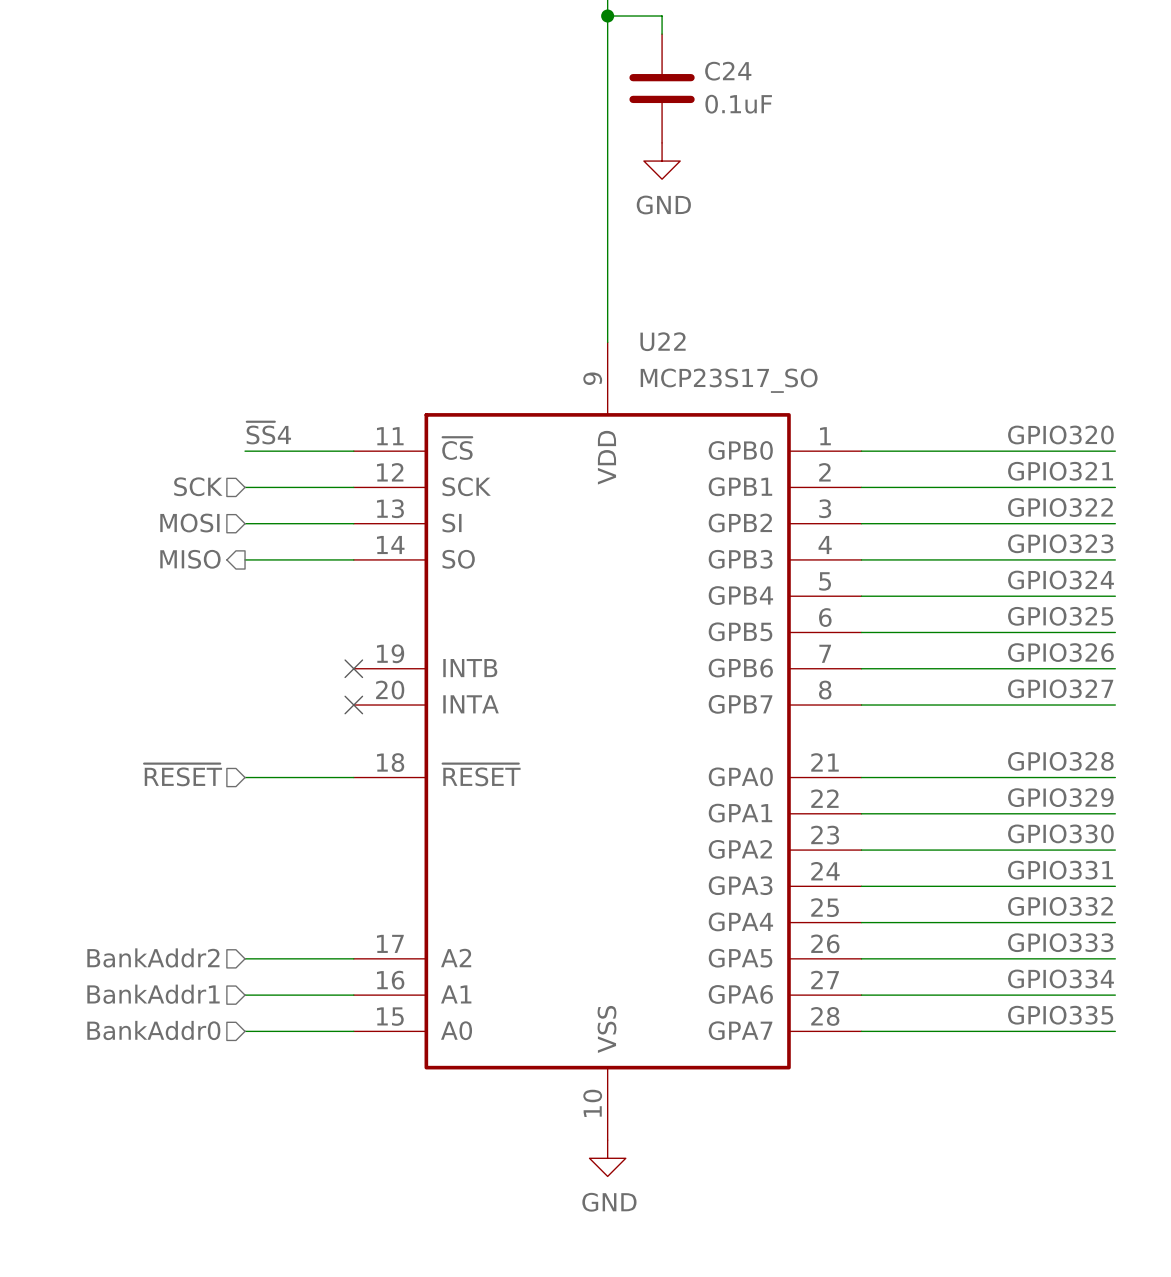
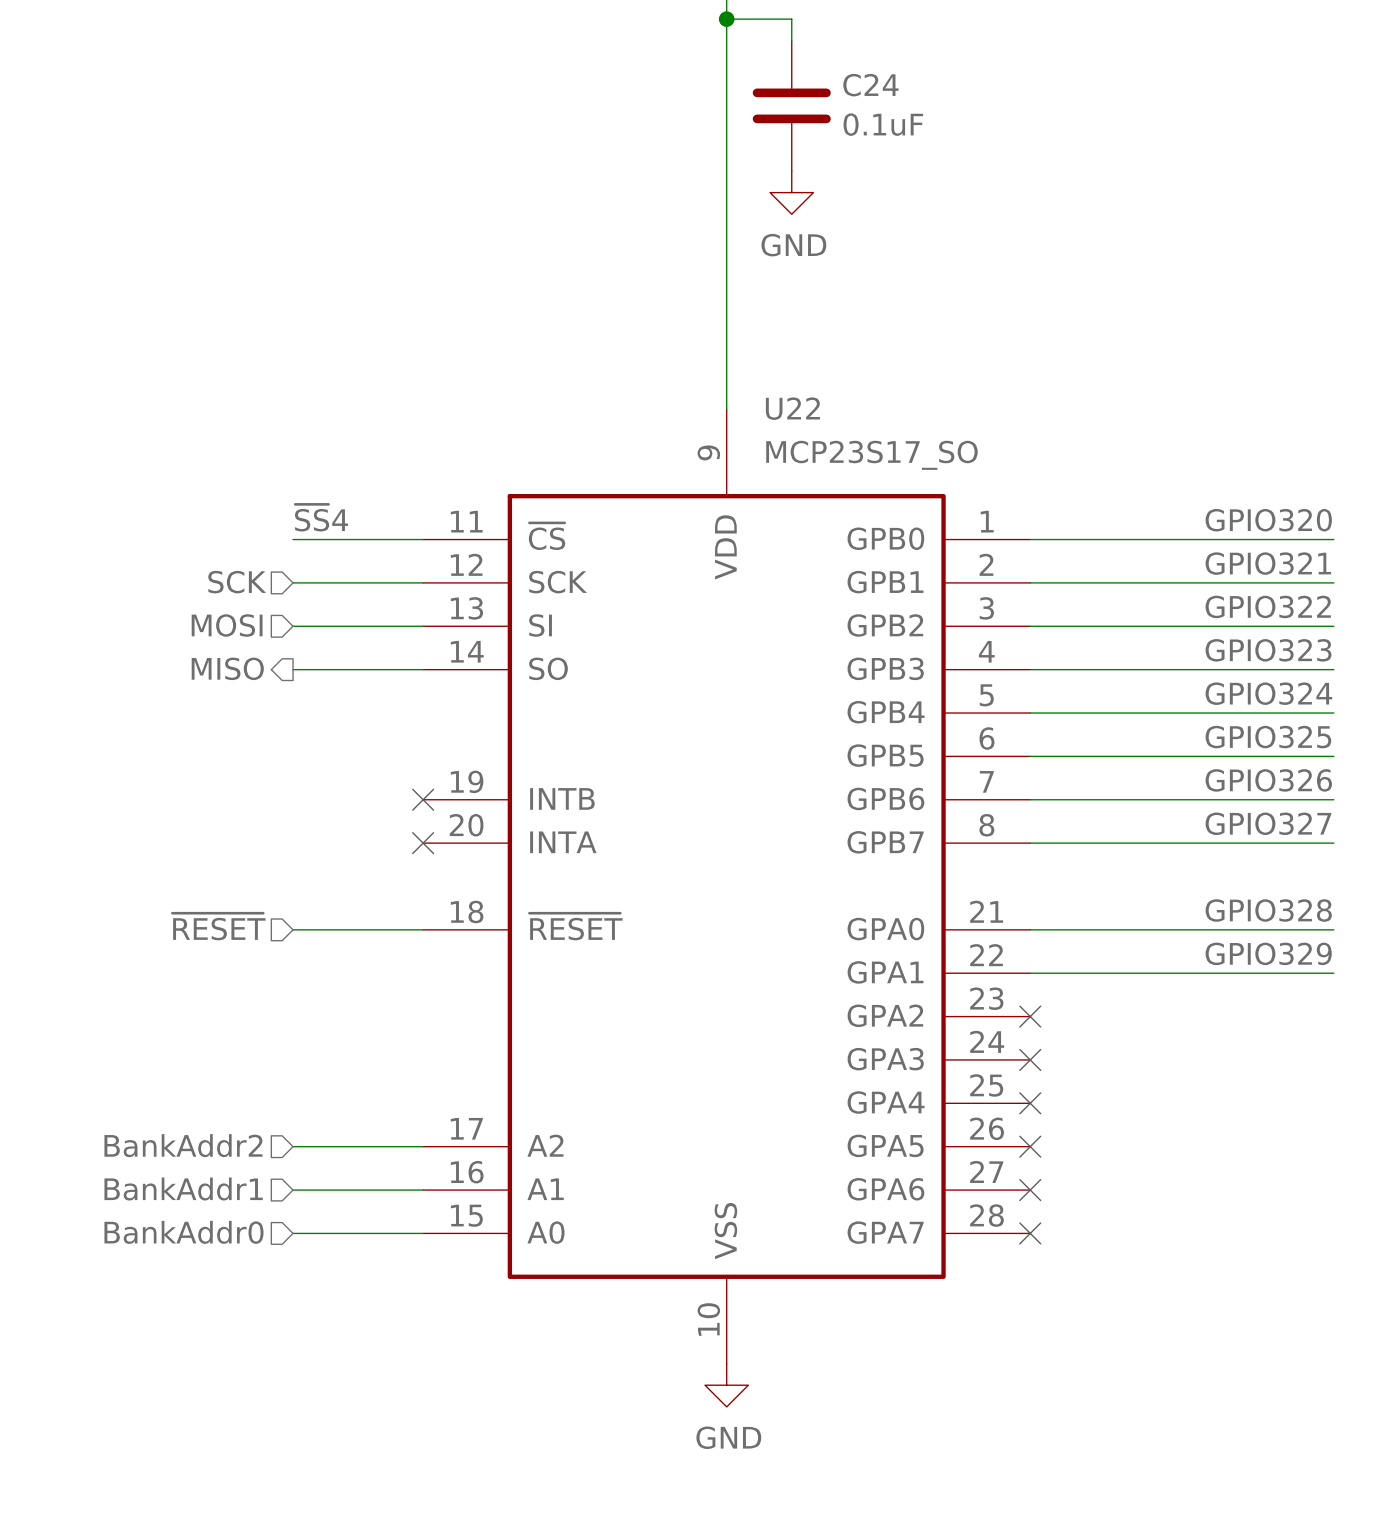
label: GPIO330 (1060, 833) -> none
wire: (861, 850) (1115, 850) -> none
no-connect mark: none -> (1030, 1016)
label: GPIO331 (1060, 870) -> none
wire: (861, 886) (1115, 886) -> none
no-connect mark: none -> (1030, 1059)
label: GPIO332 (1060, 906) -> none
wire: (861, 922) (1115, 922) -> none
no-connect mark: none -> (1030, 1103)
label: GPIO333 (1060, 942) -> none
wire: (861, 958) (1115, 958) -> none
no-connect mark: none -> (1030, 1146)
label: GPIO334 (1061, 978) -> none
wire: (861, 995) (1115, 995) -> none
no-connect mark: none -> (1030, 1190)
label: GPIO335 (1060, 1015) -> none
wire: (861, 1031) (1115, 1031) -> none
no-connect mark: none -> (1030, 1233)

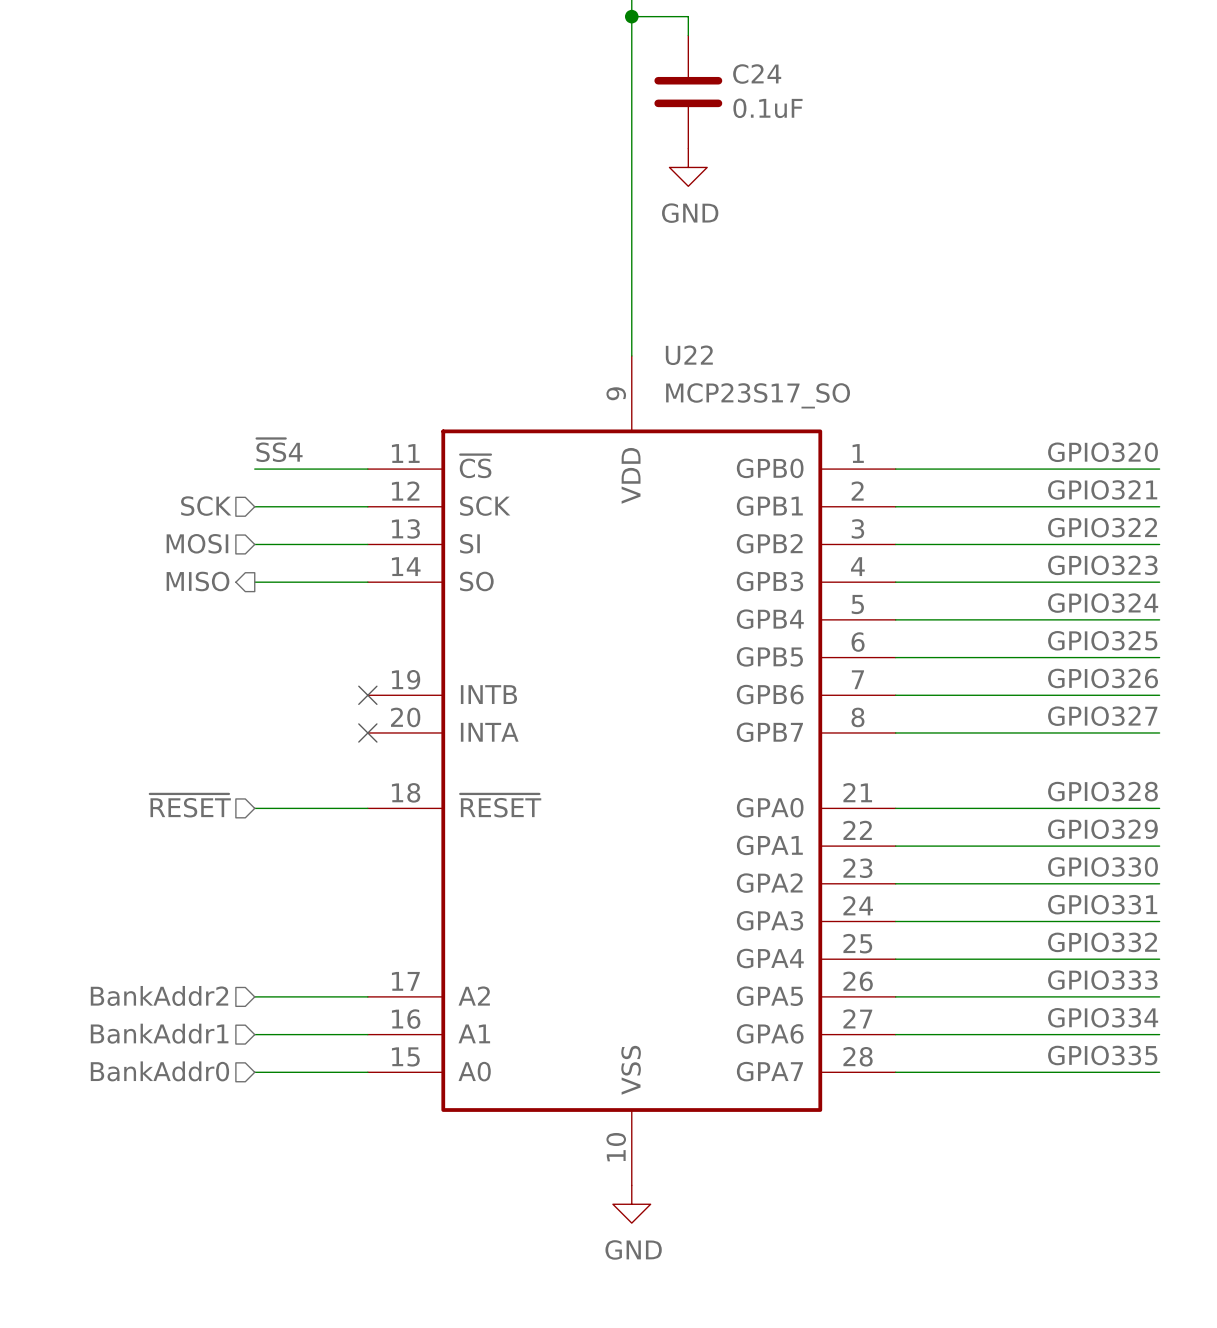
label: none -> GPIO330 (1102, 866)
wire: none -> (895, 883) (1159, 883)
no-connect mark: (1030, 1016) -> none
label: none -> GPIO331 (1102, 904)
wire: none -> (895, 921) (1159, 921)
no-connect mark: (1030, 1059) -> none
label: none -> GPIO332 (1102, 942)
wire: none -> (895, 959) (1159, 959)
no-connect mark: (1030, 1103) -> none
label: none -> GPIO333 (1102, 980)
wire: none -> (895, 996) (1159, 996)
no-connect mark: (1030, 1146) -> none
label: none -> GPIO334 (1103, 1017)
wire: none -> (895, 1034) (1159, 1034)
no-connect mark: (1030, 1190) -> none
label: none -> GPIO335 (1102, 1055)
wire: none -> (895, 1072) (1159, 1072)
no-connect mark: (1030, 1233) -> none

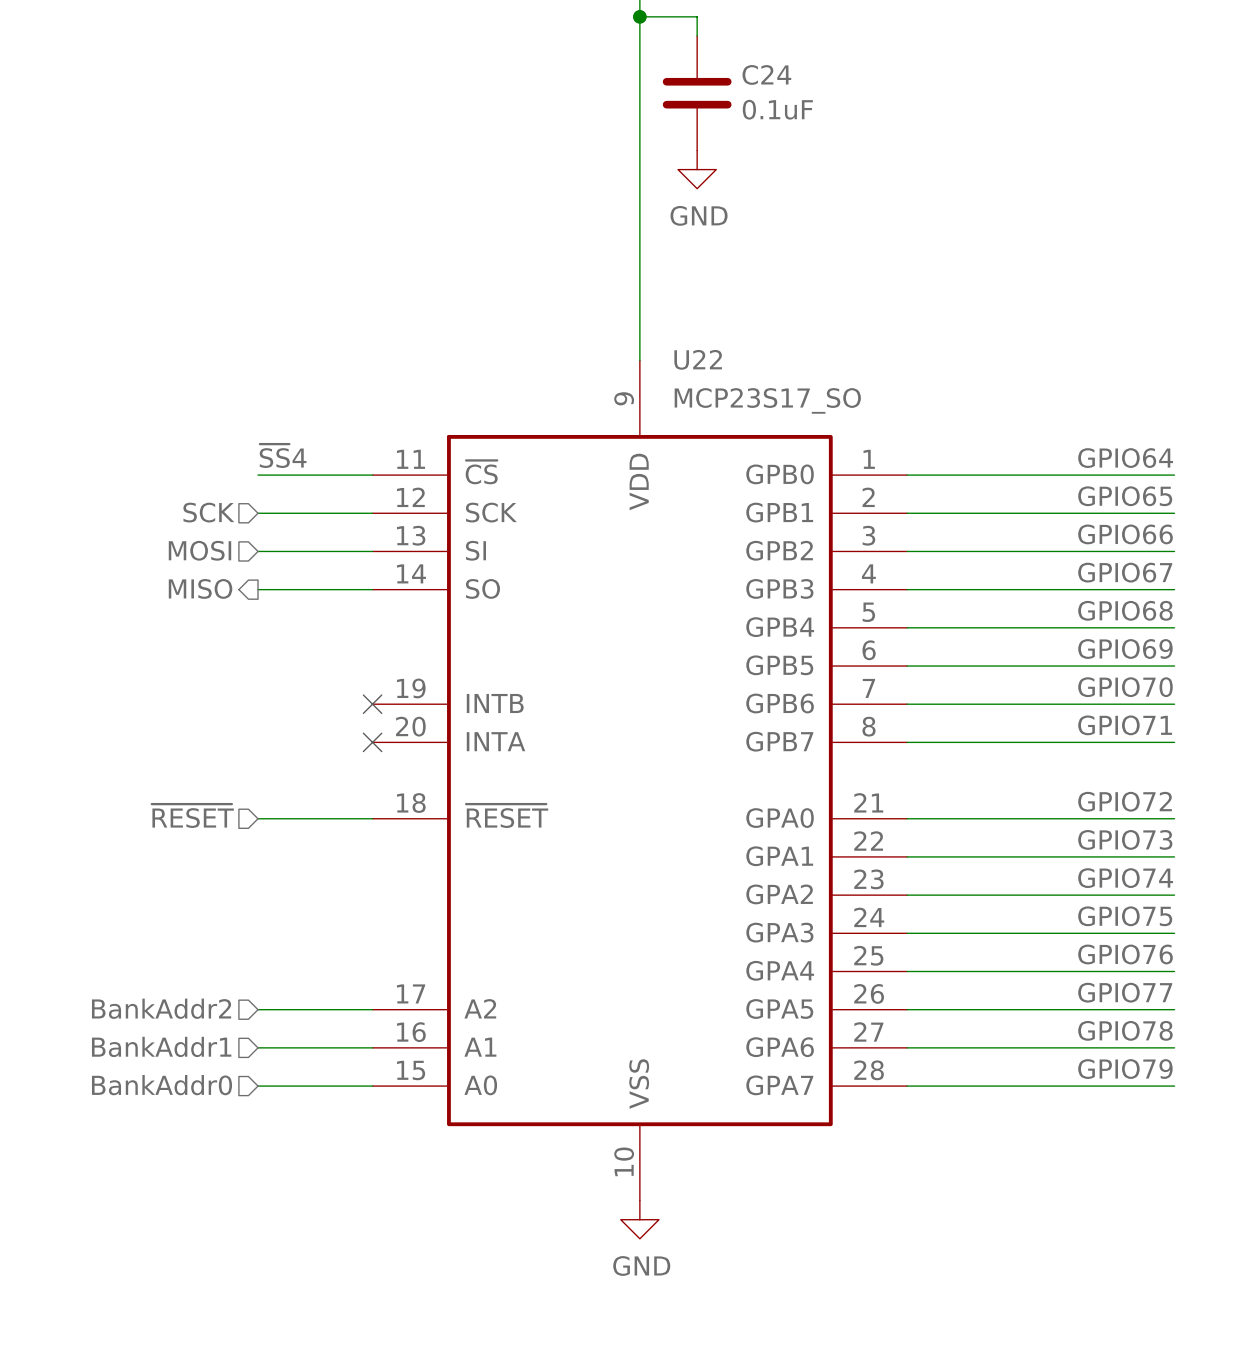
label: GPIO320 (1102, 452) -> GPIO64 (1125, 458)
label: GPIO321 (1102, 489) -> GPIO65 (1125, 496)
label: GPIO322 (1102, 527) -> GPIO66 (1125, 534)
label: GPIO323 (1102, 565) -> GPIO67 (1125, 572)
label: GPIO324 (1103, 603) -> GPIO68 (1125, 610)
label: GPIO325 (1102, 640) -> GPIO69 (1125, 648)
label: GPIO326 (1103, 678) -> GPIO70 (1125, 687)
label: GPIO327 (1102, 716) -> GPIO71 (1125, 725)
label: GPIO328 (1102, 791) -> GPIO72 (1125, 801)
label: GPIO329 (1102, 829) -> GPIO73 (1125, 839)
label: GPIO330 (1102, 866) -> GPIO74 (1125, 878)
label: GPIO331 (1102, 904) -> GPIO75 (1125, 916)
label: GPIO332 (1102, 942) -> GPIO76 (1125, 954)
label: GPIO333 (1102, 980) -> GPIO77 (1125, 992)
label: GPIO334 (1103, 1017) -> GPIO78 (1125, 1030)
label: GPIO335 (1102, 1055) -> GPIO79 (1125, 1069)

